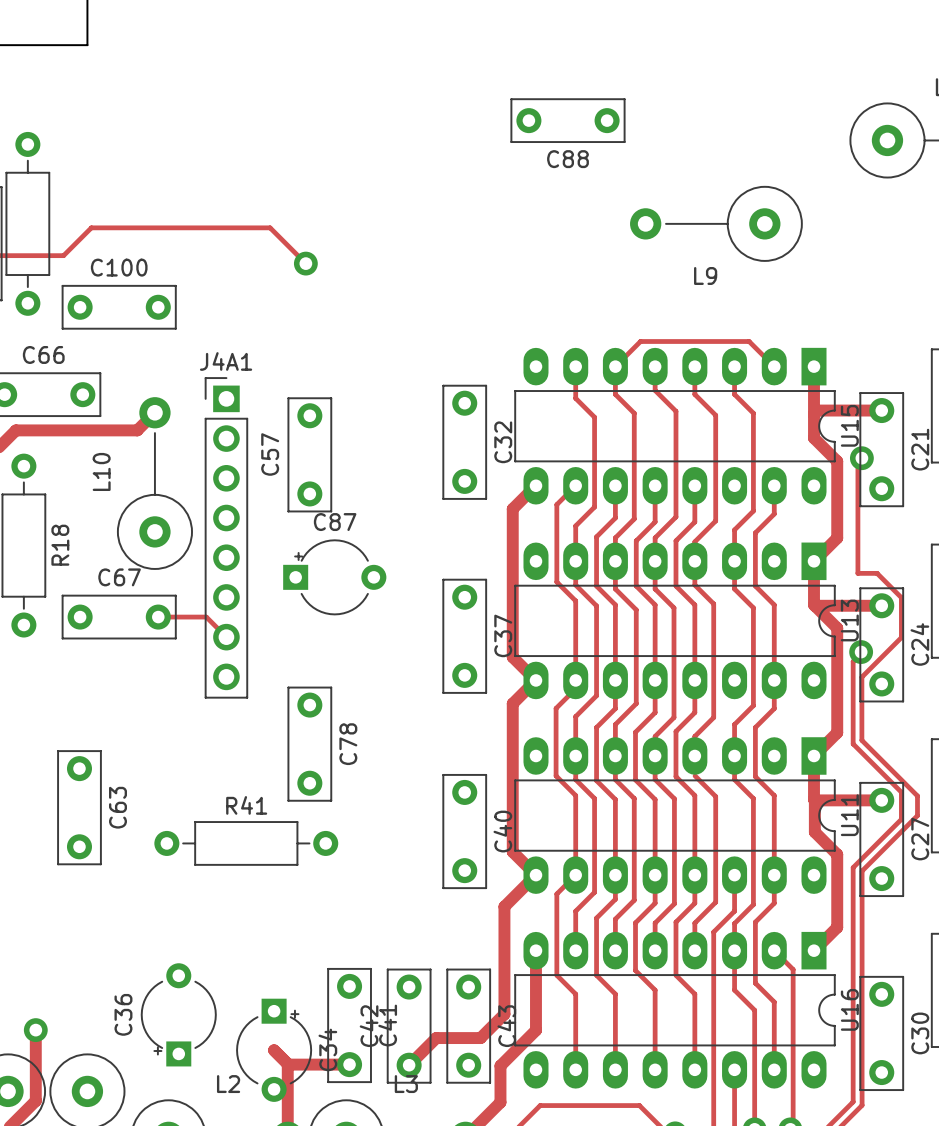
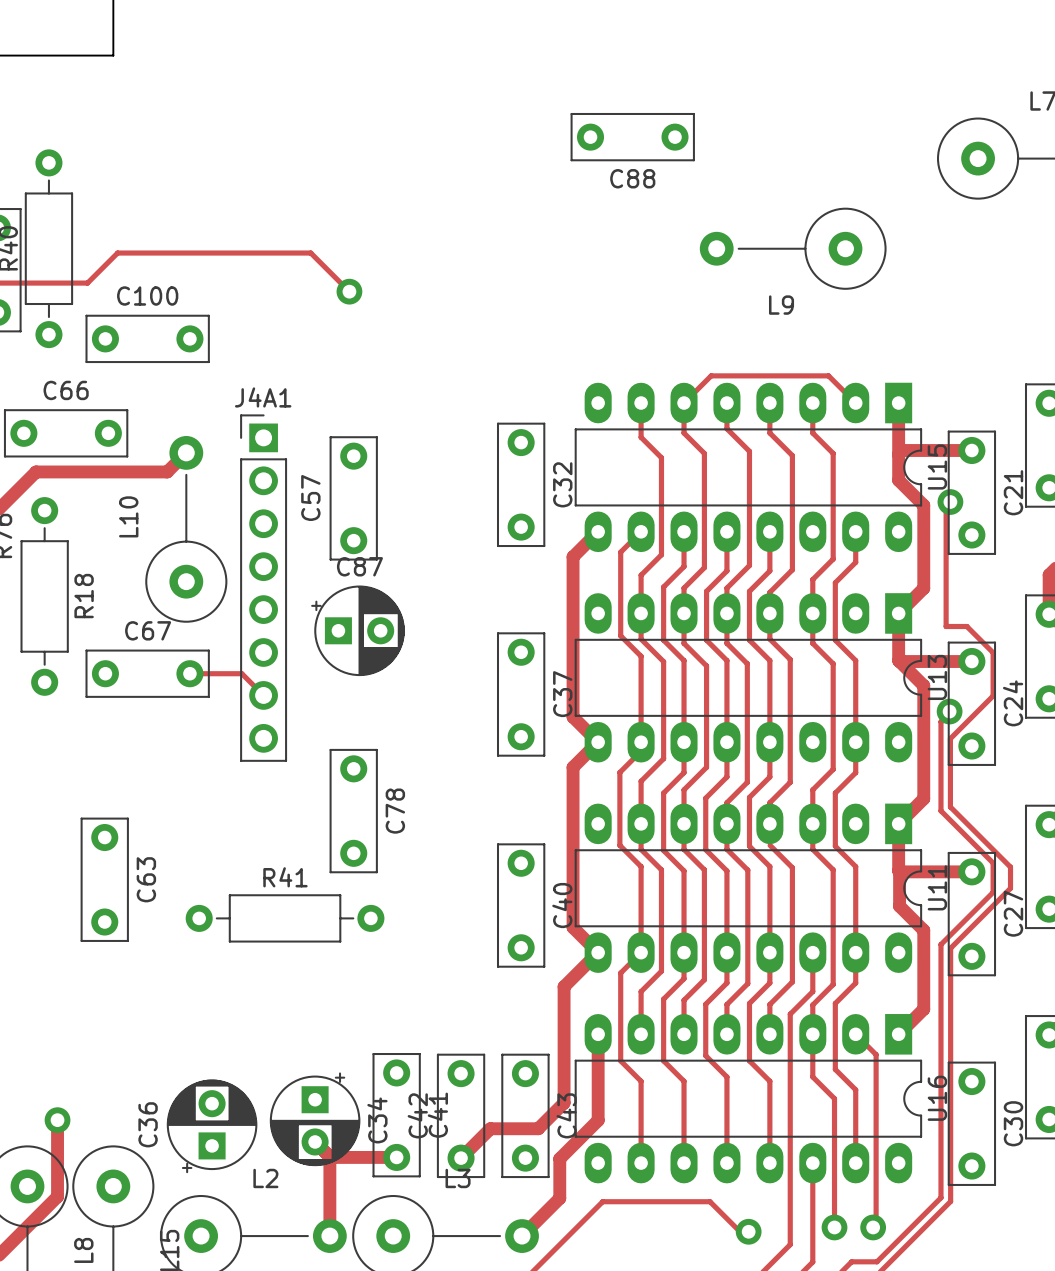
C87 footprint: [283, 539, 387, 616] -> [311, 585, 405, 677]
C36 footprint: [140, 963, 217, 1067] -> [166, 1079, 258, 1174]
C34 footprint: [236, 998, 313, 1102] -> [269, 1072, 361, 1167]

